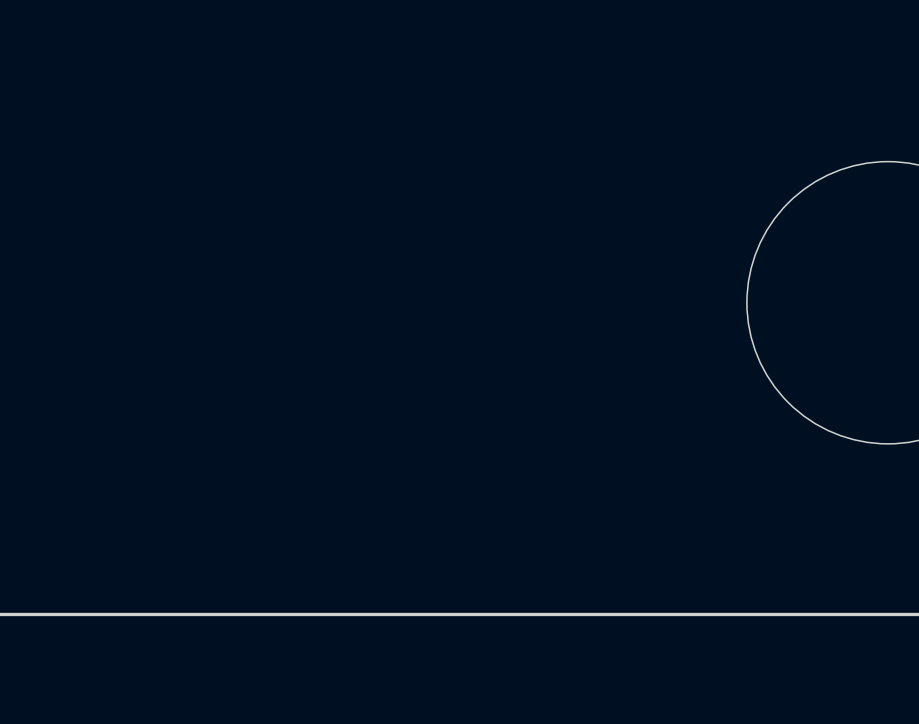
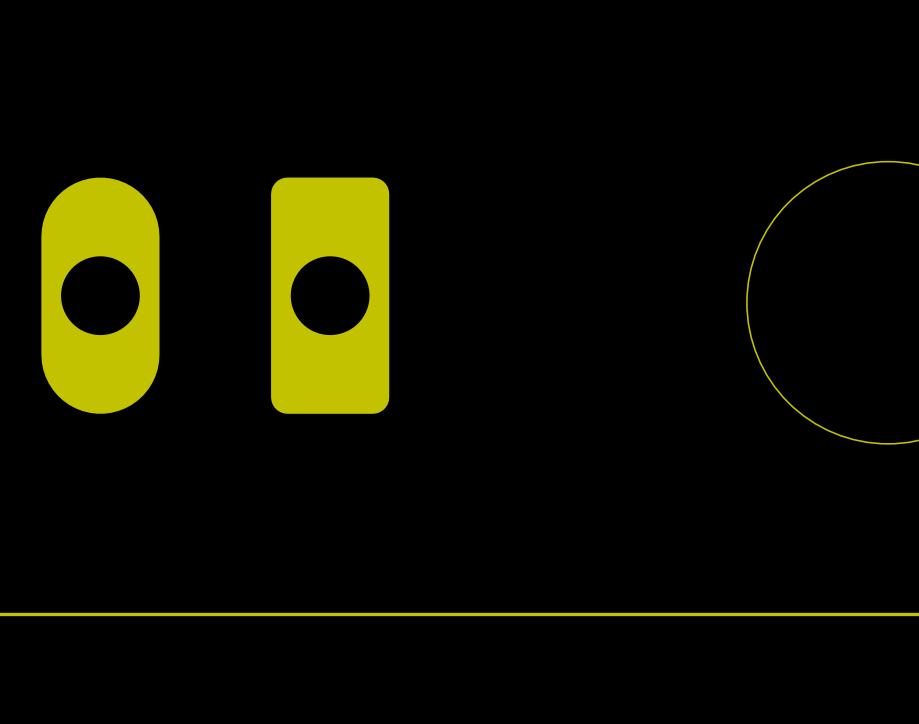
part: none -> (215, 295)

